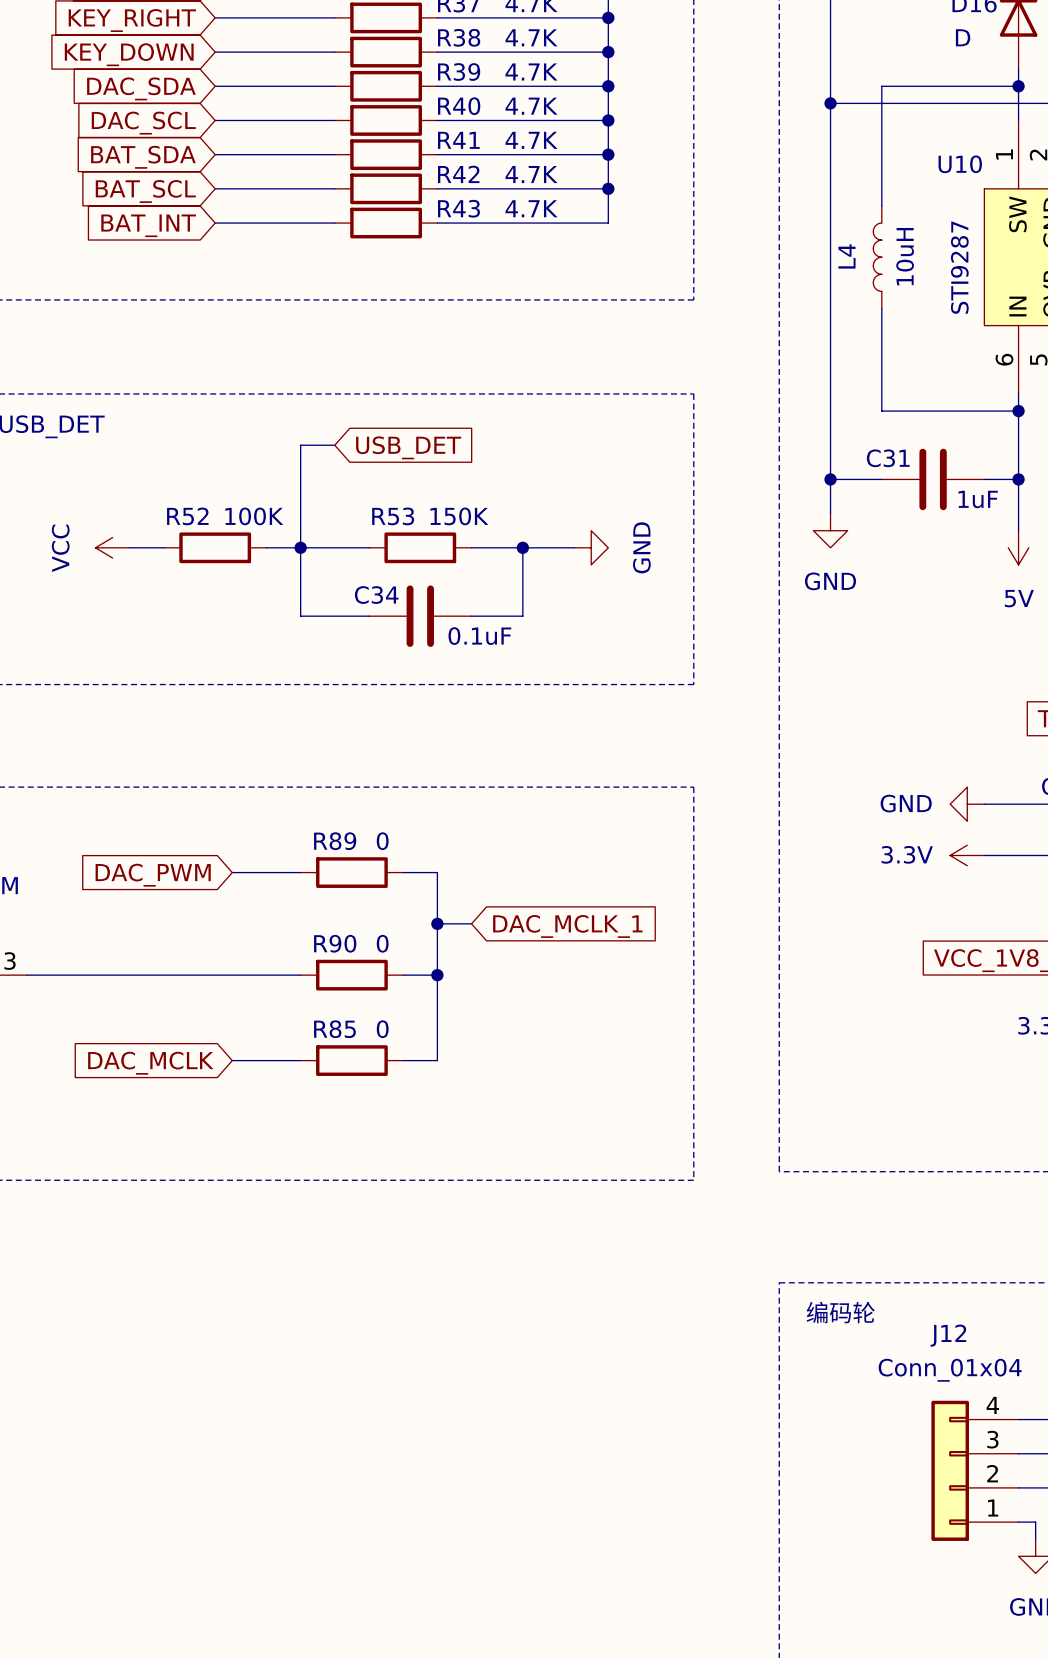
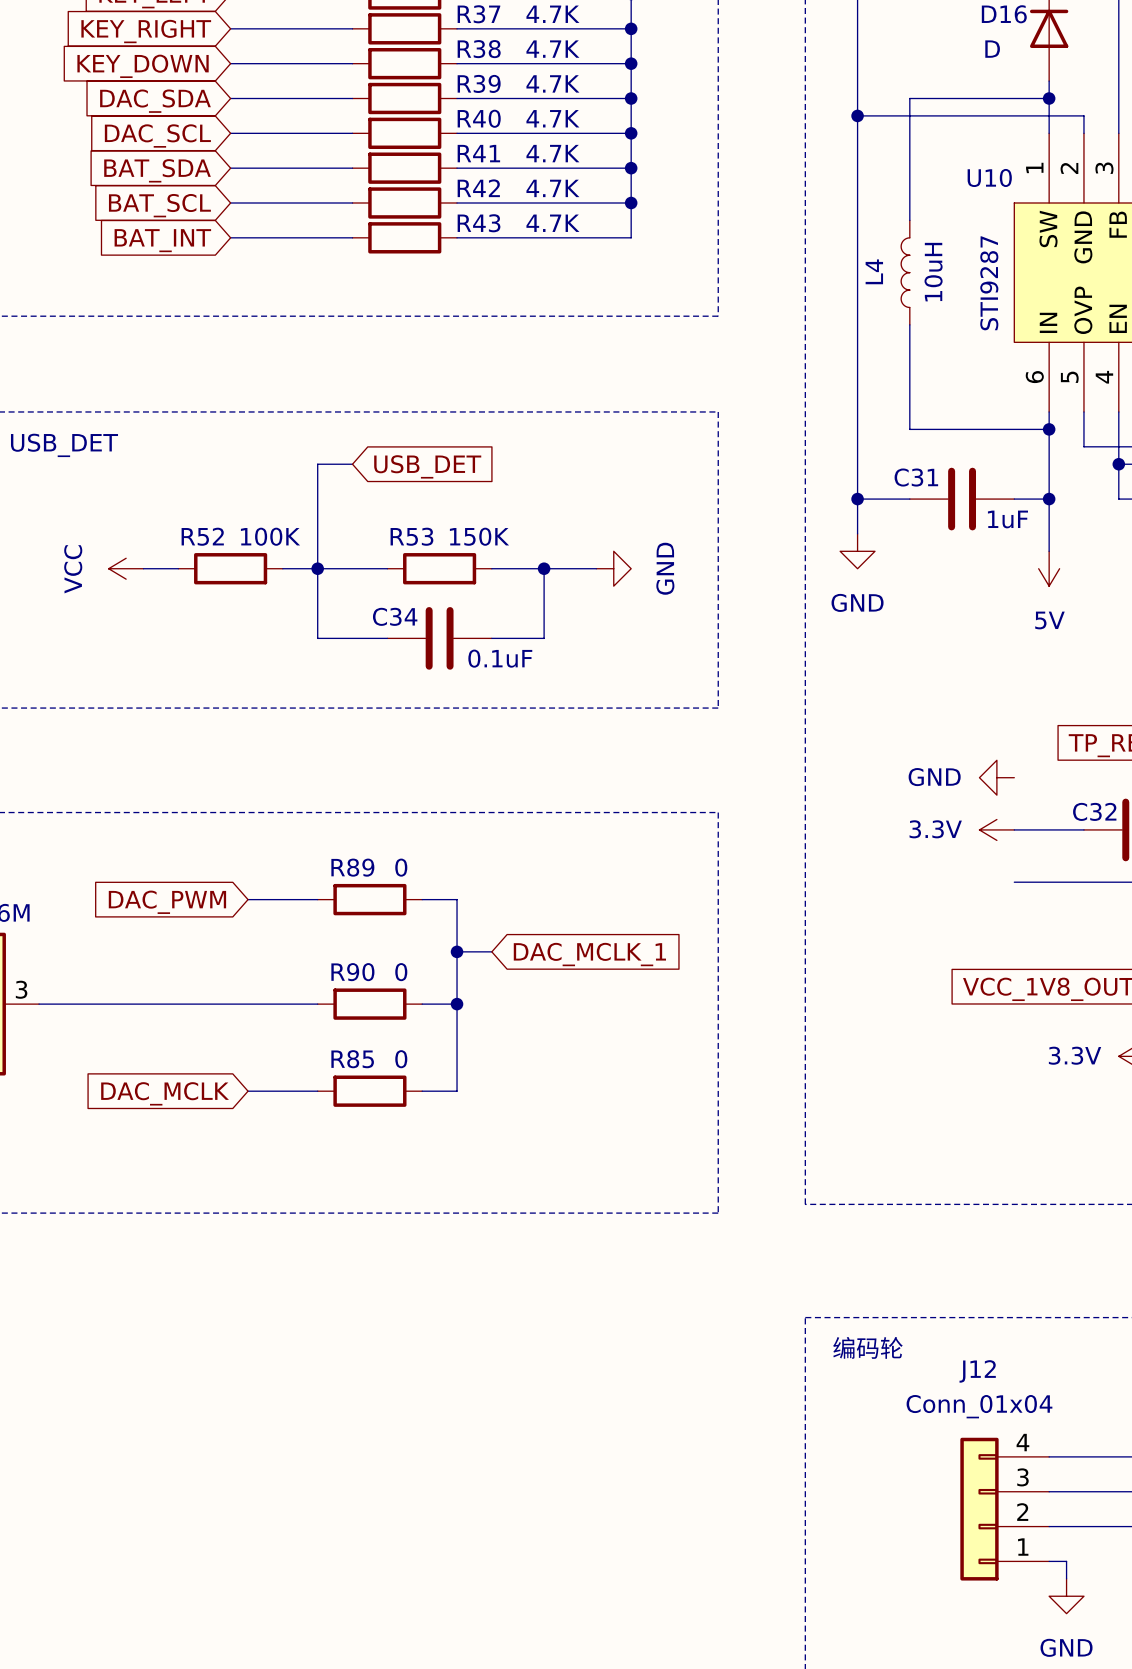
power symbol: none -> GND (996, 777)
power symbol: GND (967, 804) -> 3.3V (996, 829)
power symbol: 3.3V (967, 855) -> none

